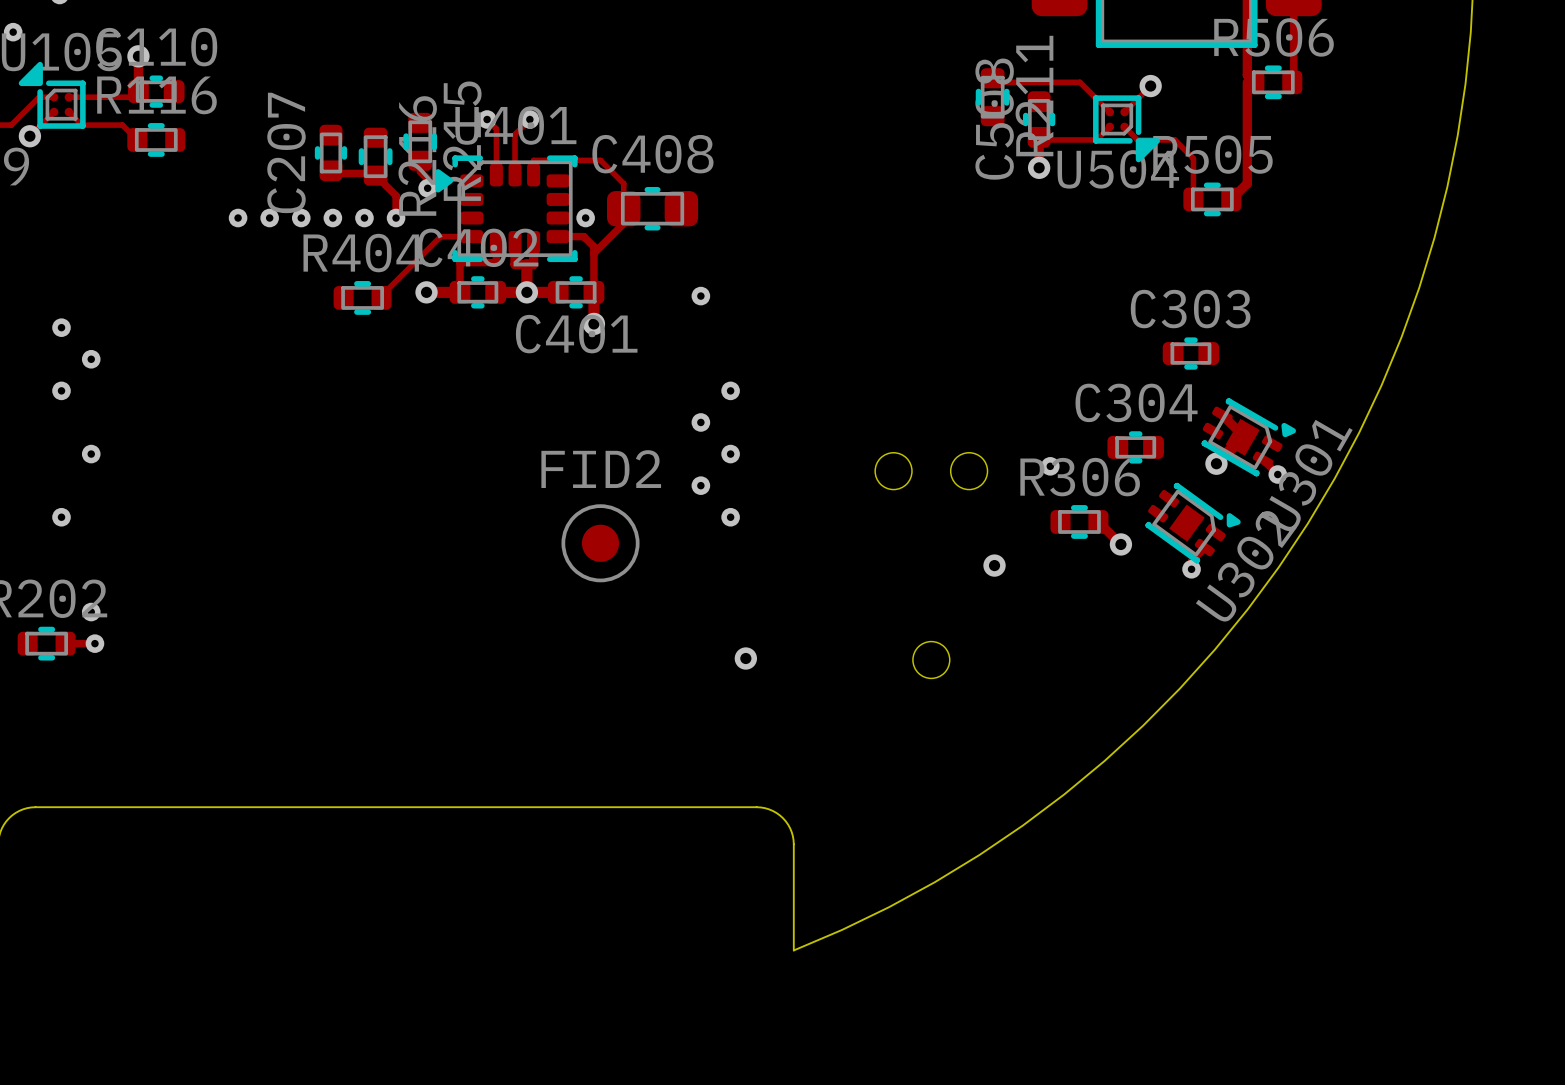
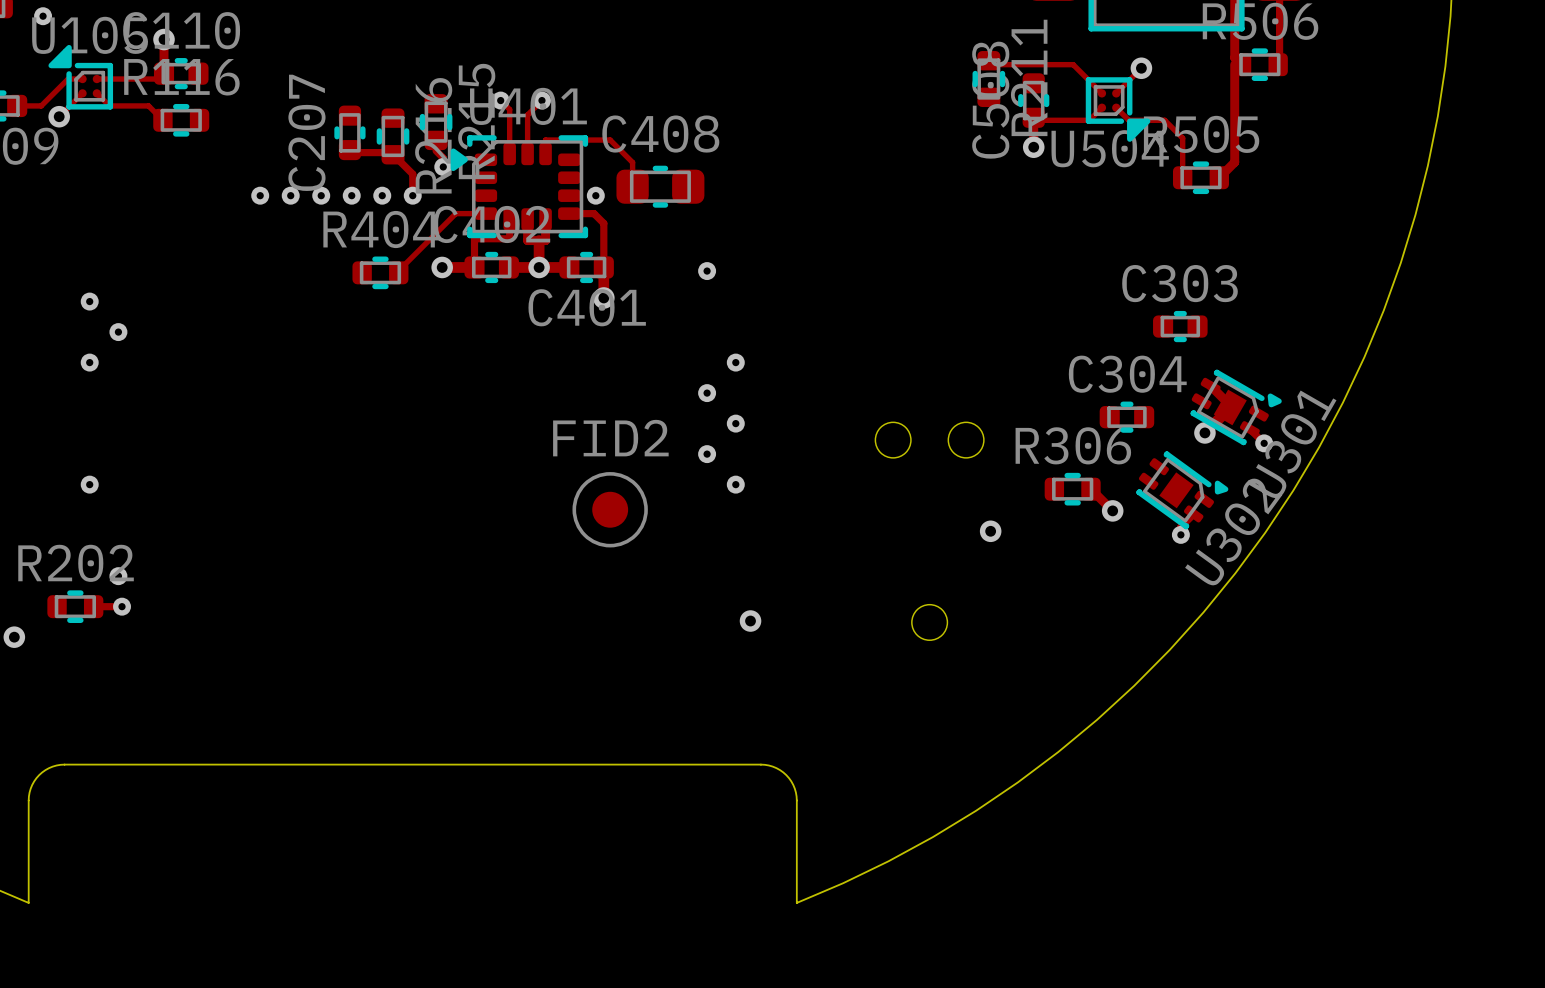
track: (623, 208) (623, 223) (593, 253) -> none
via: (91, 454) -> none
via: (1050, 466) -> none

